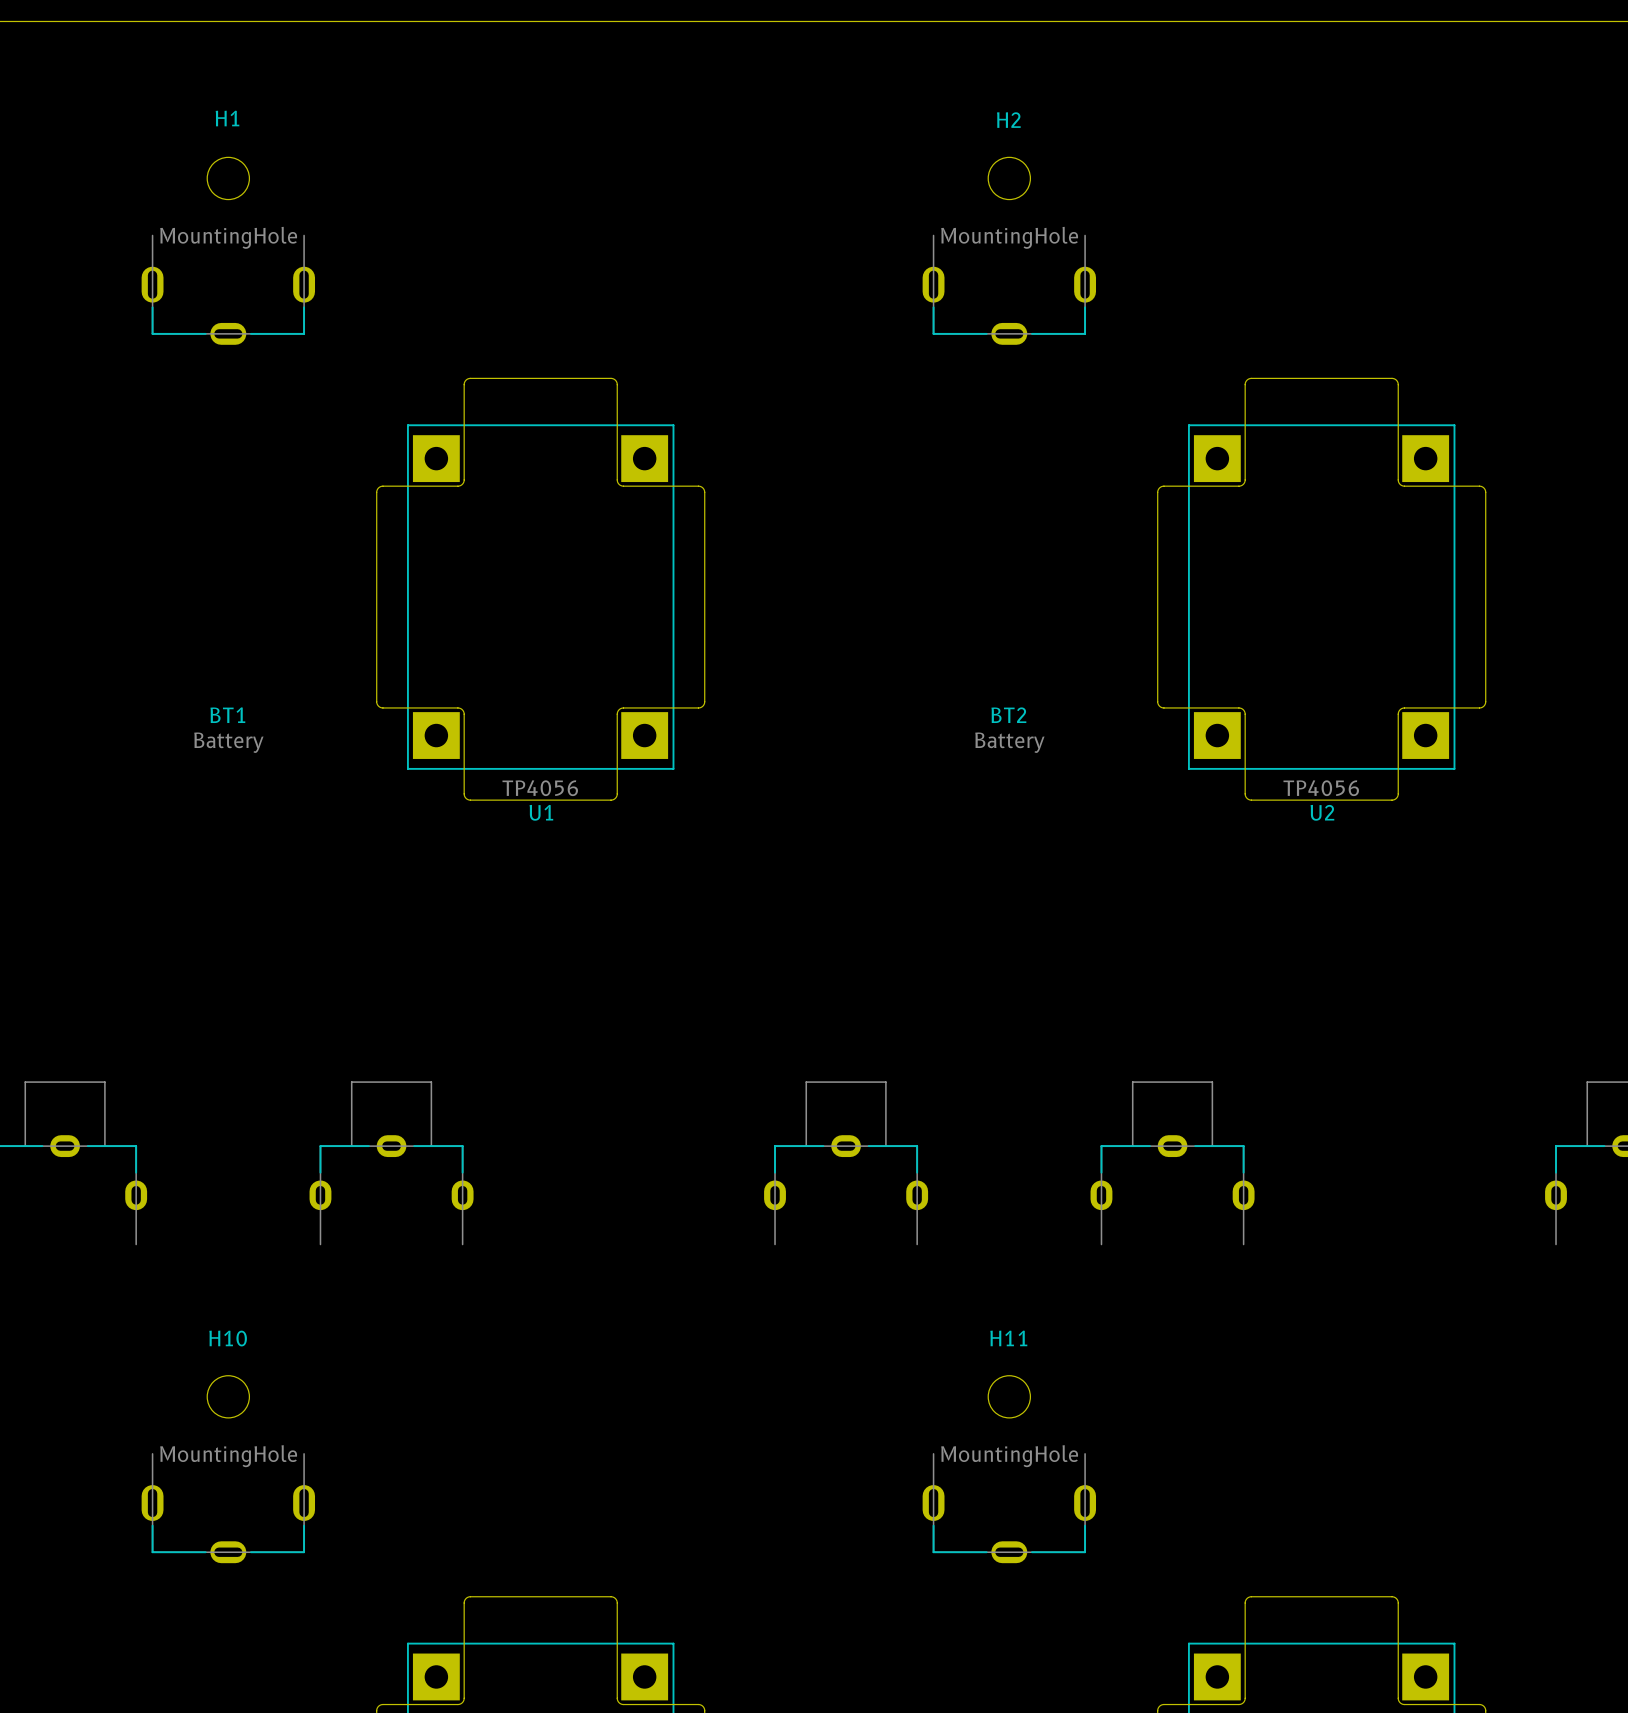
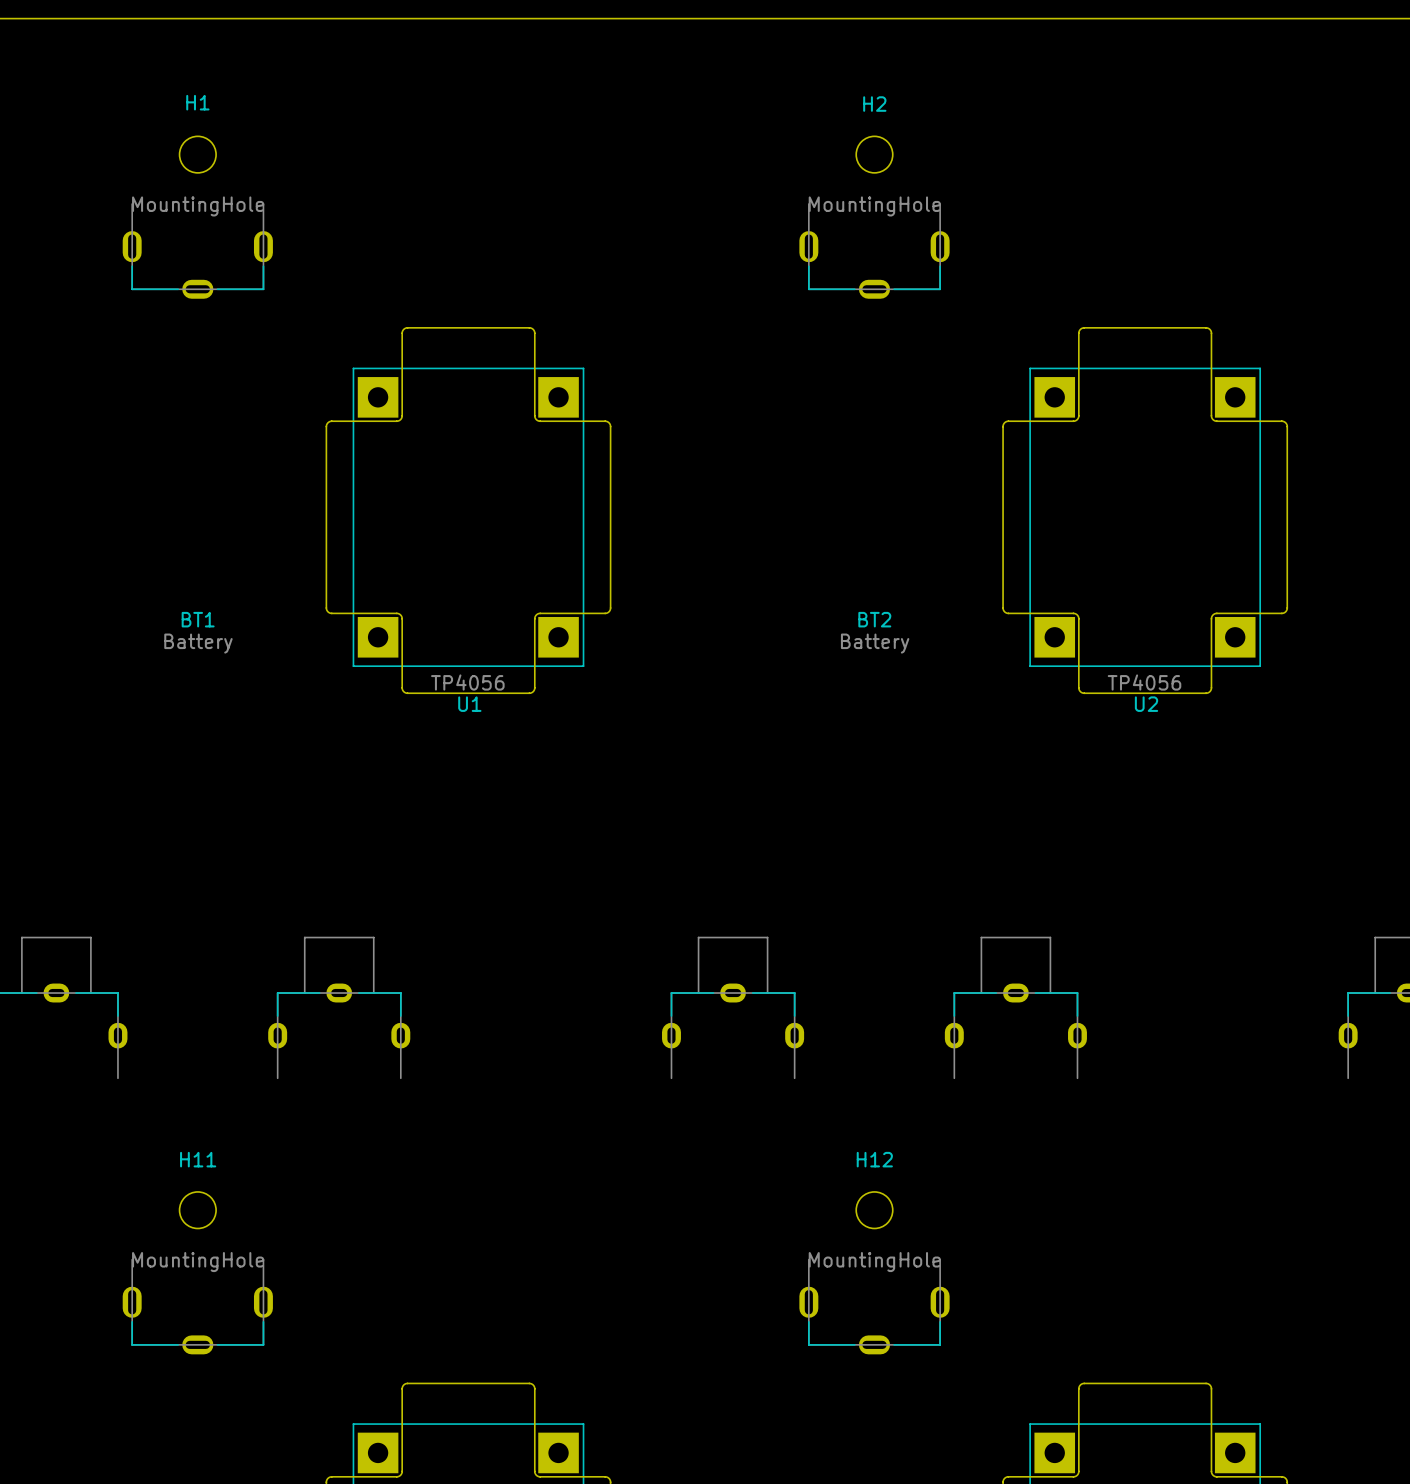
H10 name: H10 (228, 1338) -> H11 (198, 1159)
H11 name: H11 (1008, 1338) -> H12 (874, 1159)

